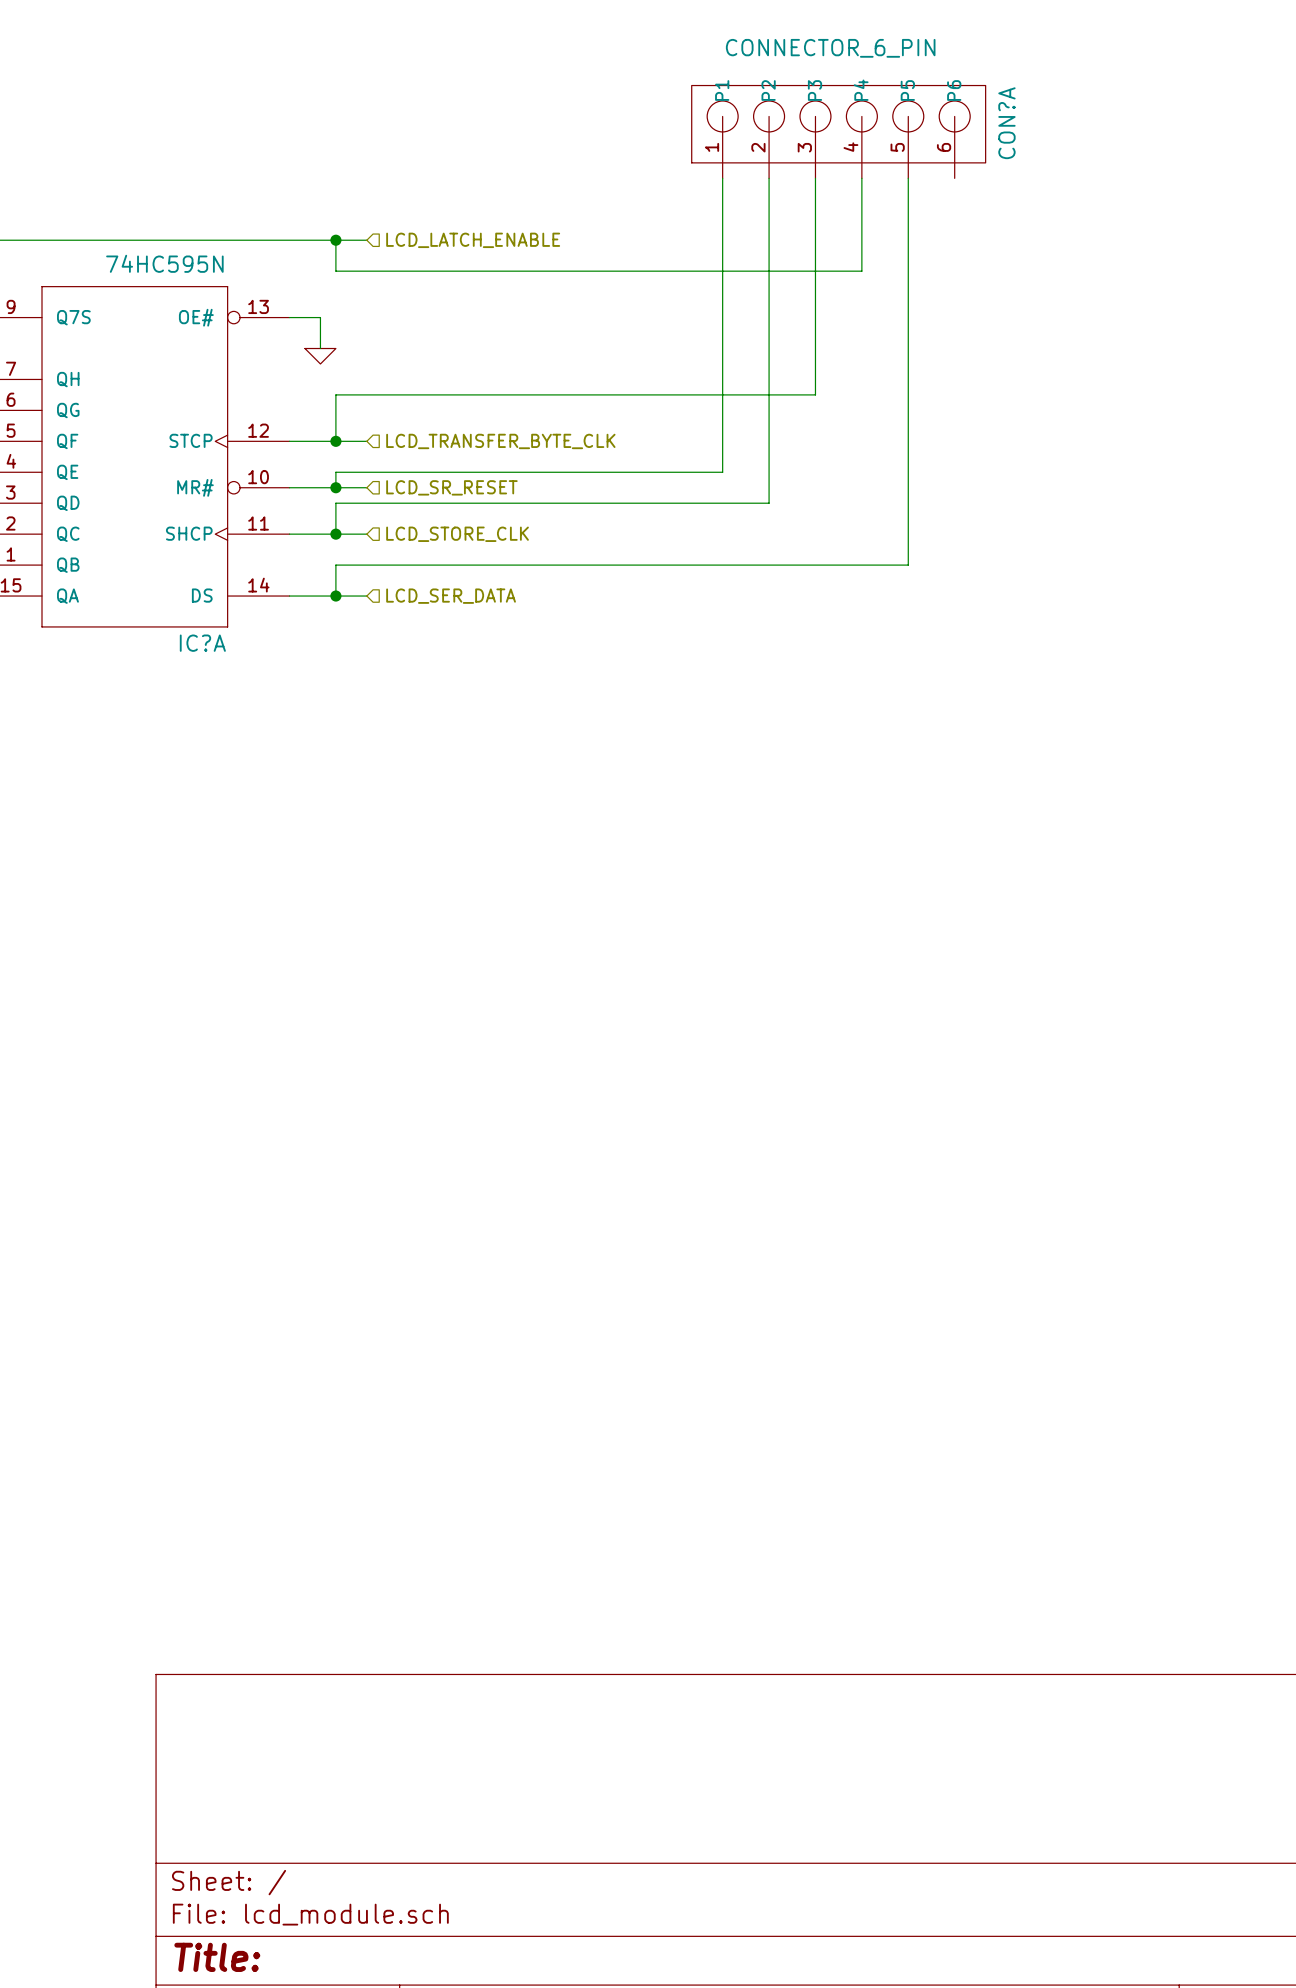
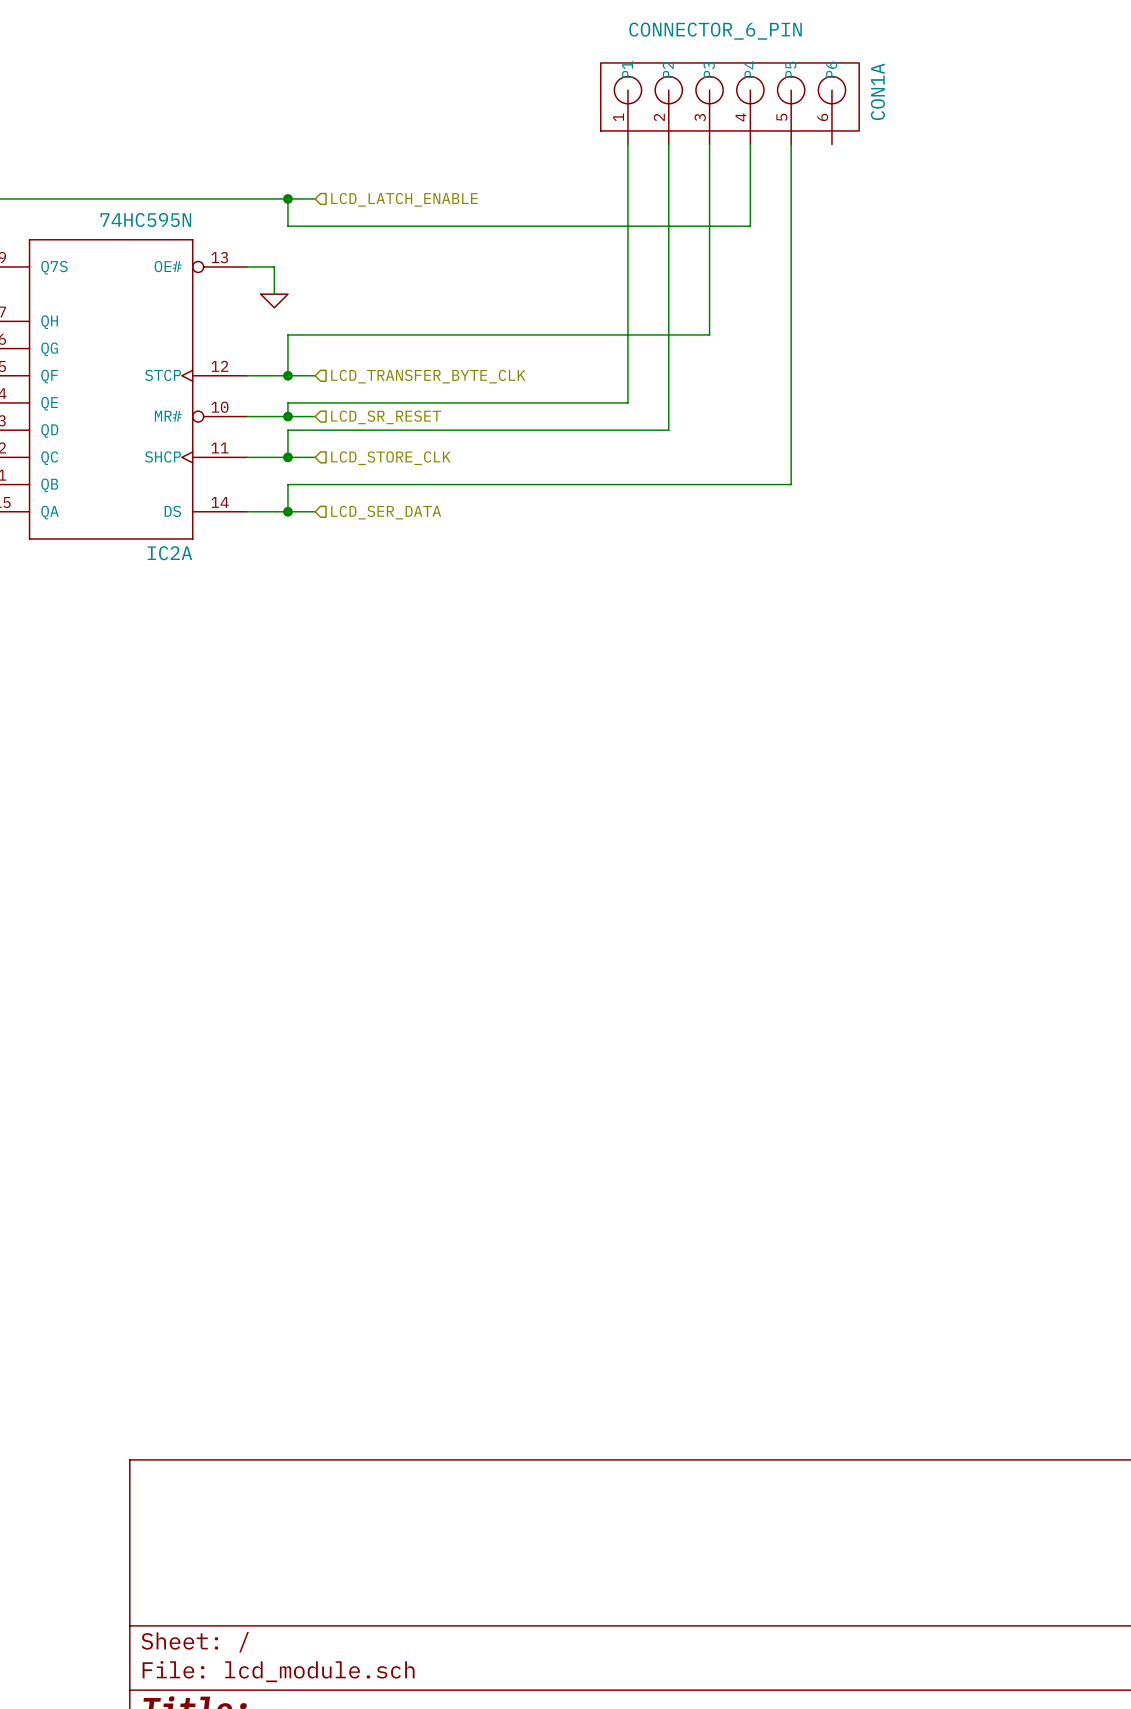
CON?A name: CON?A (1006, 123) -> CON1A (877, 91)
IC?A name: IC?A (202, 643) -> IC2A (169, 553)

